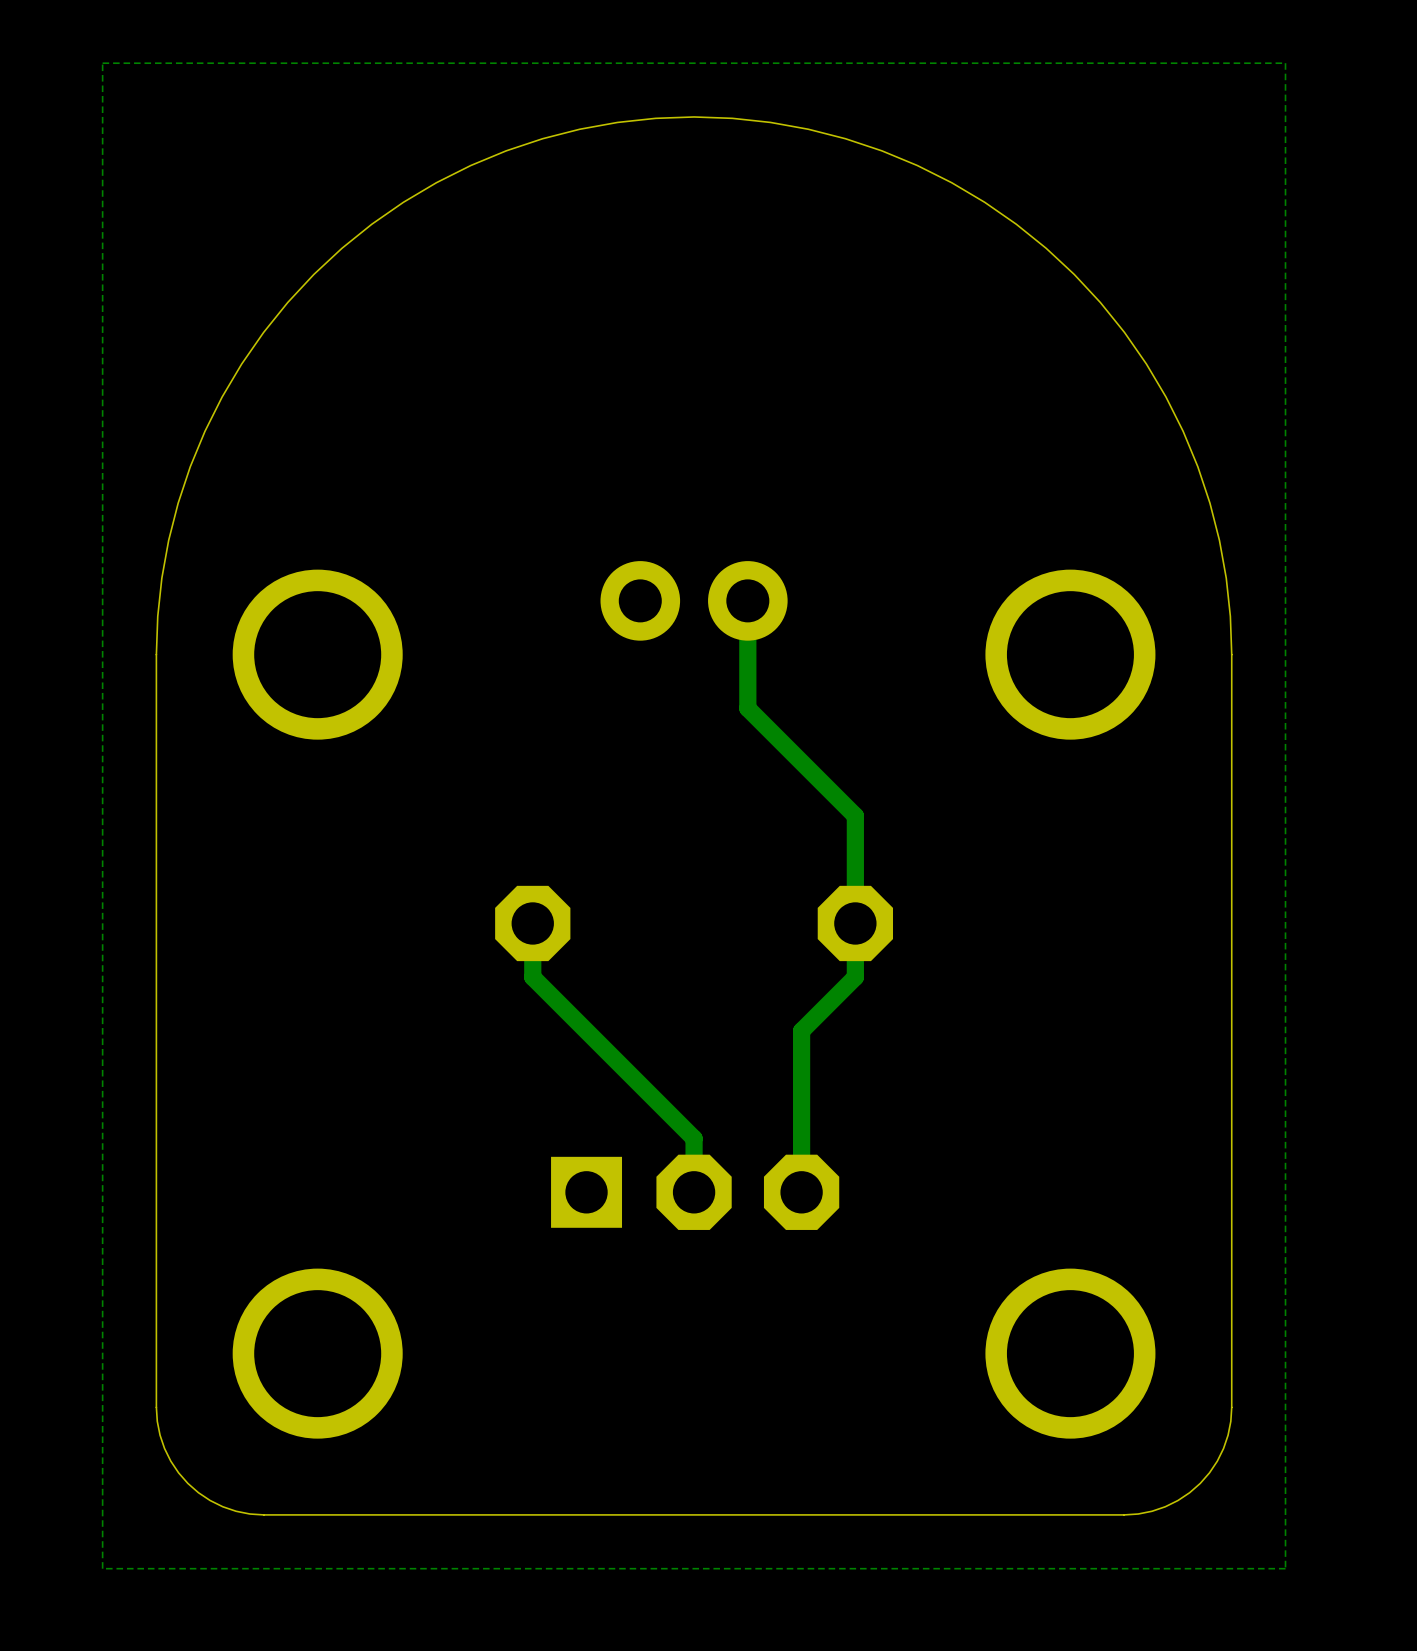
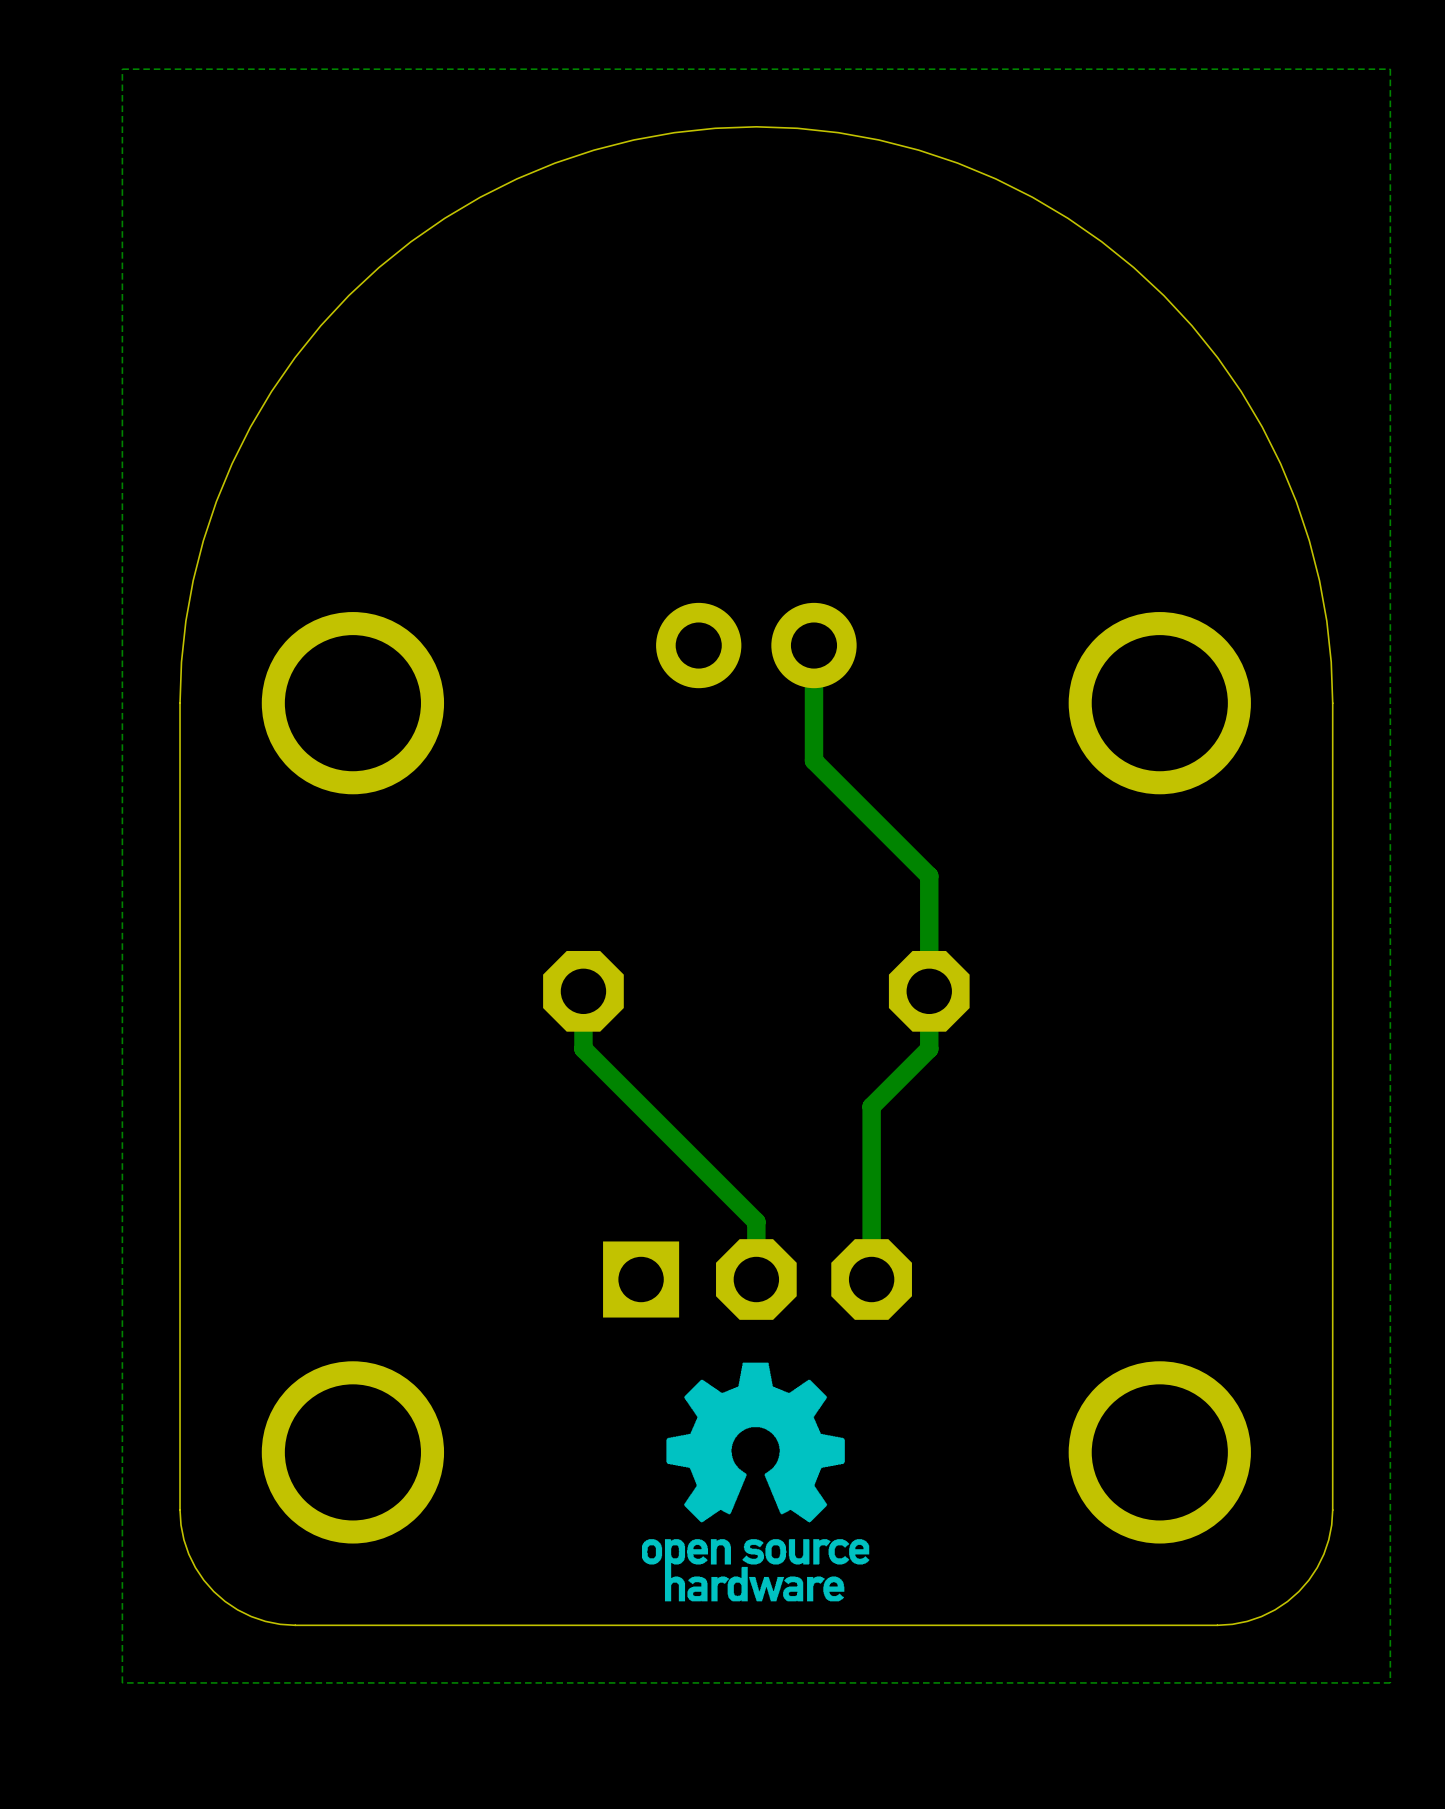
drawing: none -> [642, 1362, 870, 1602]

